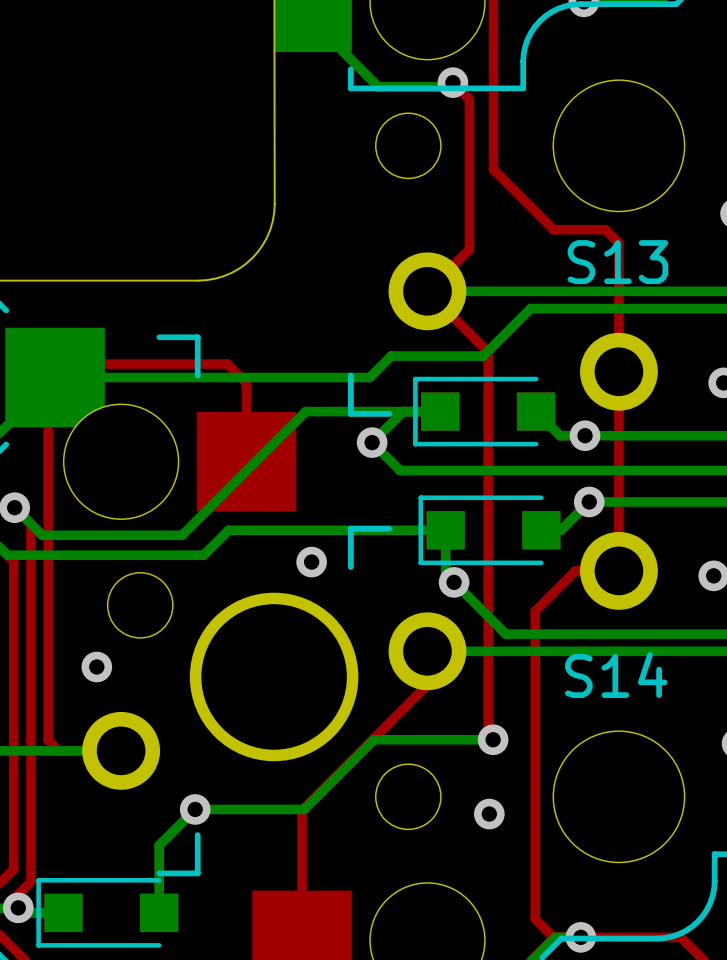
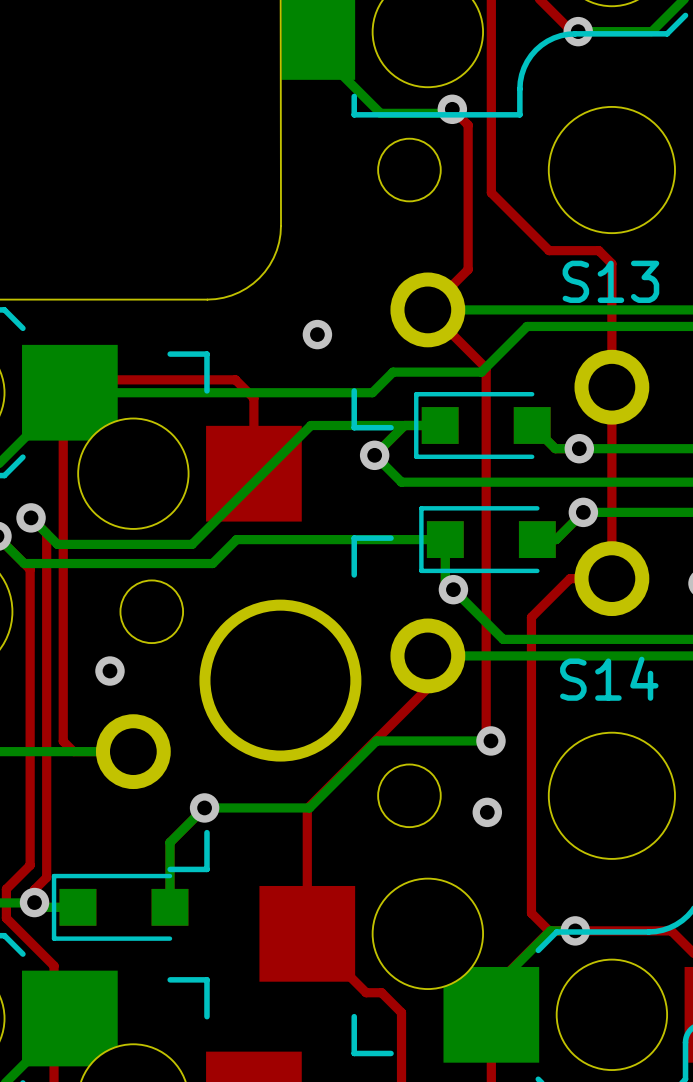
via: none -> (317, 334)
via: (311, 562) -> none

